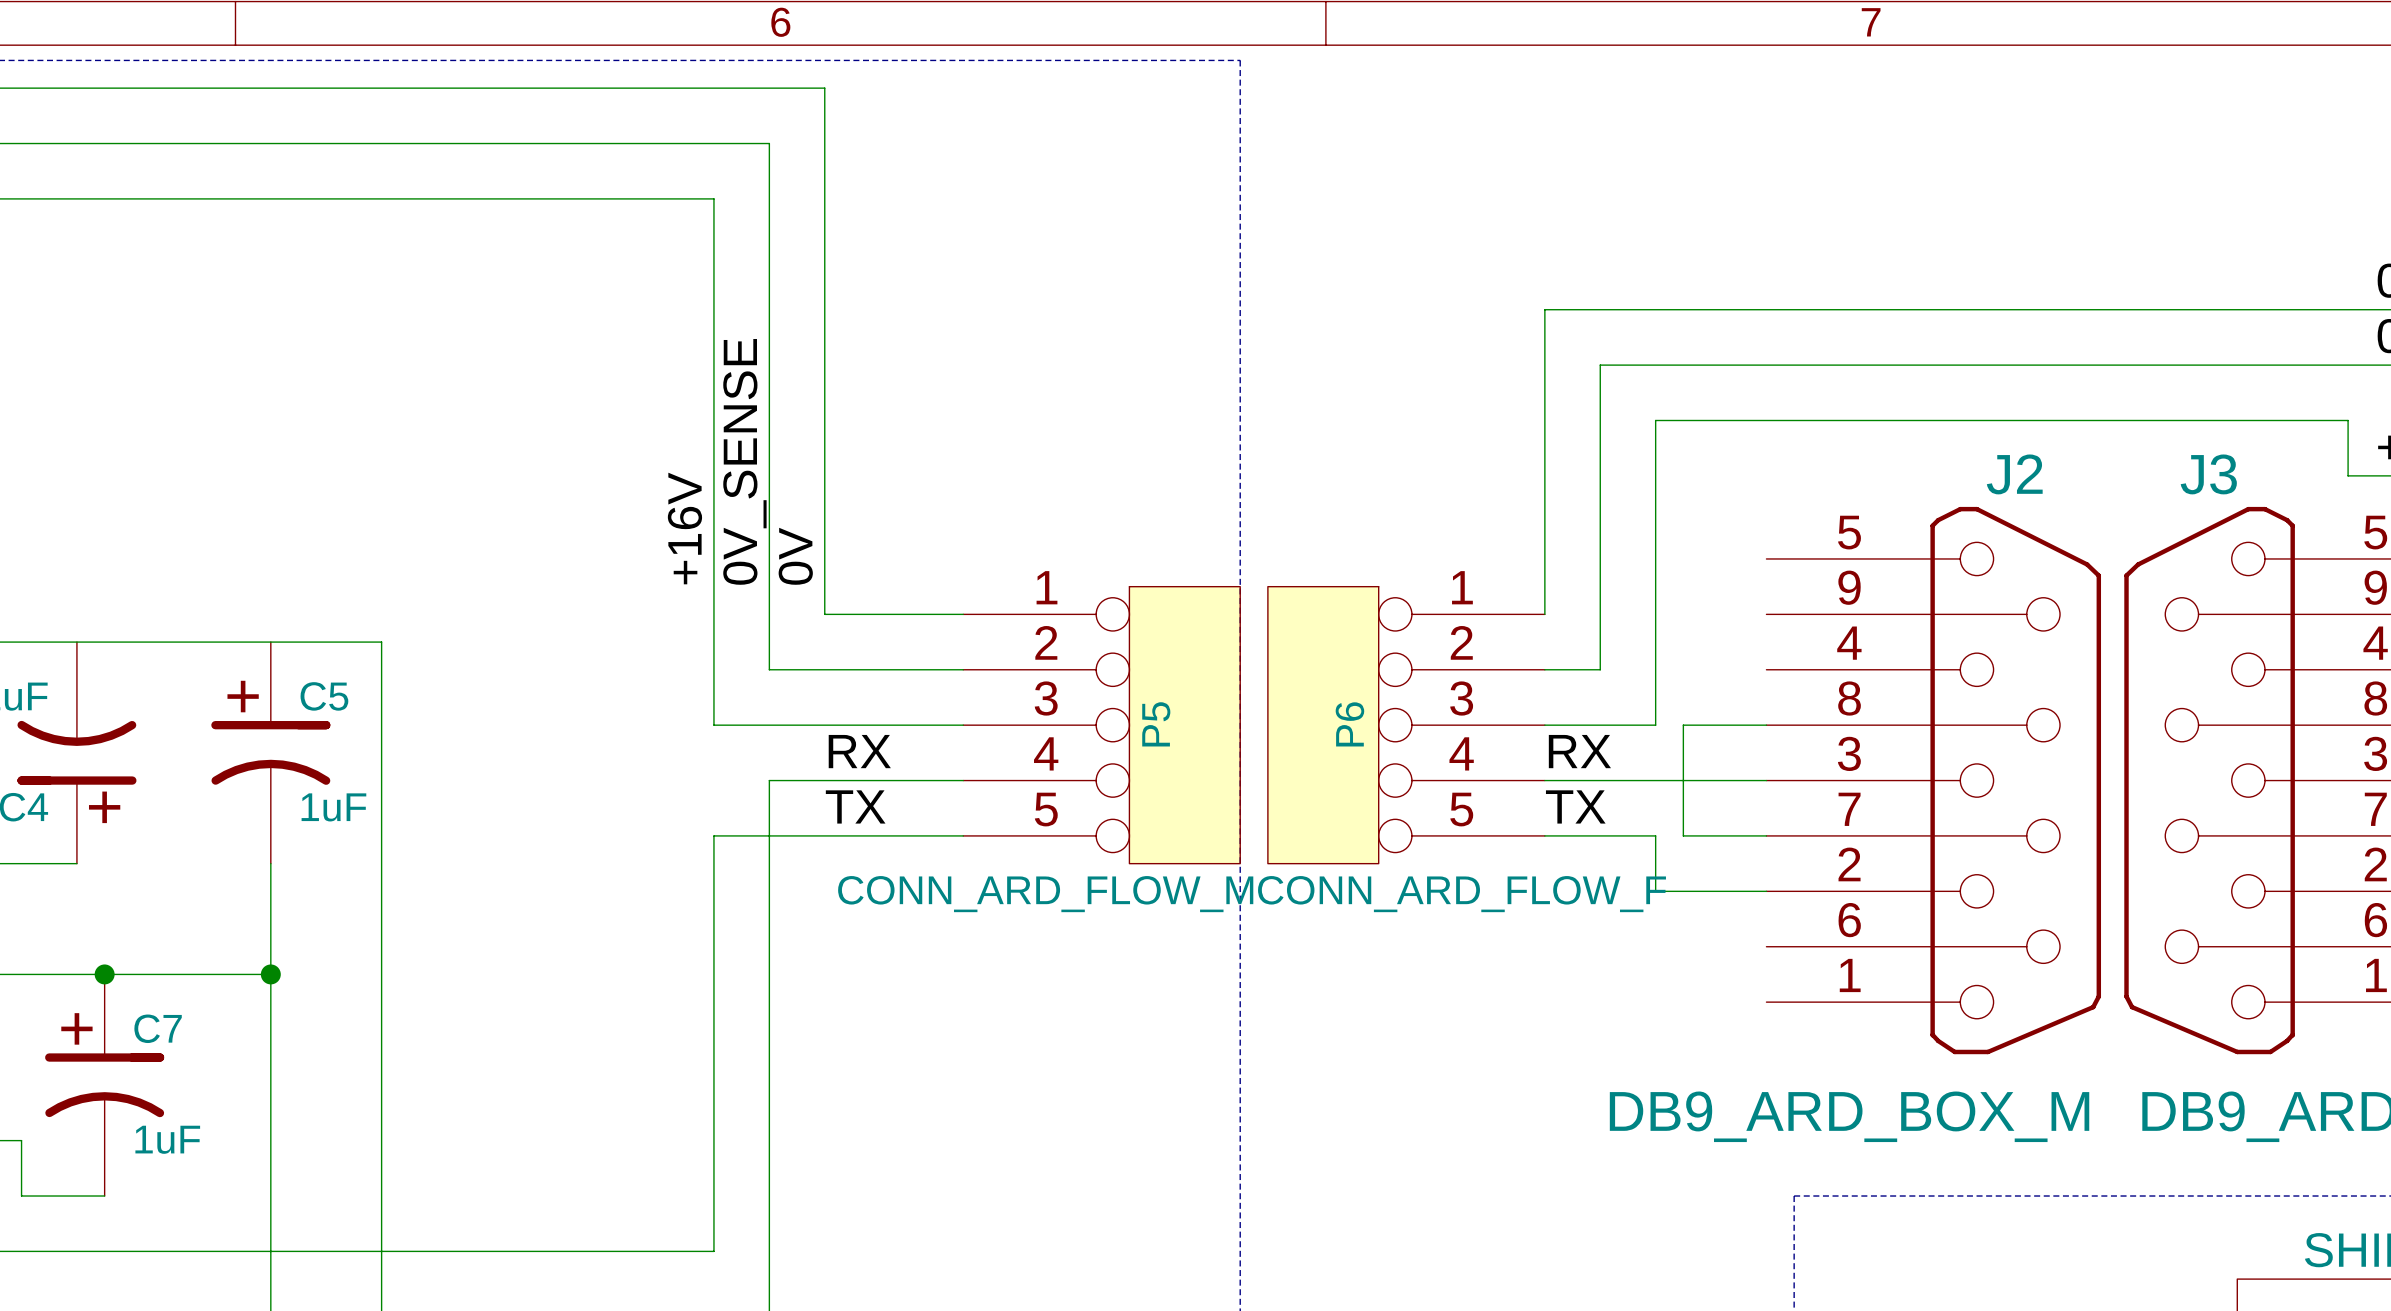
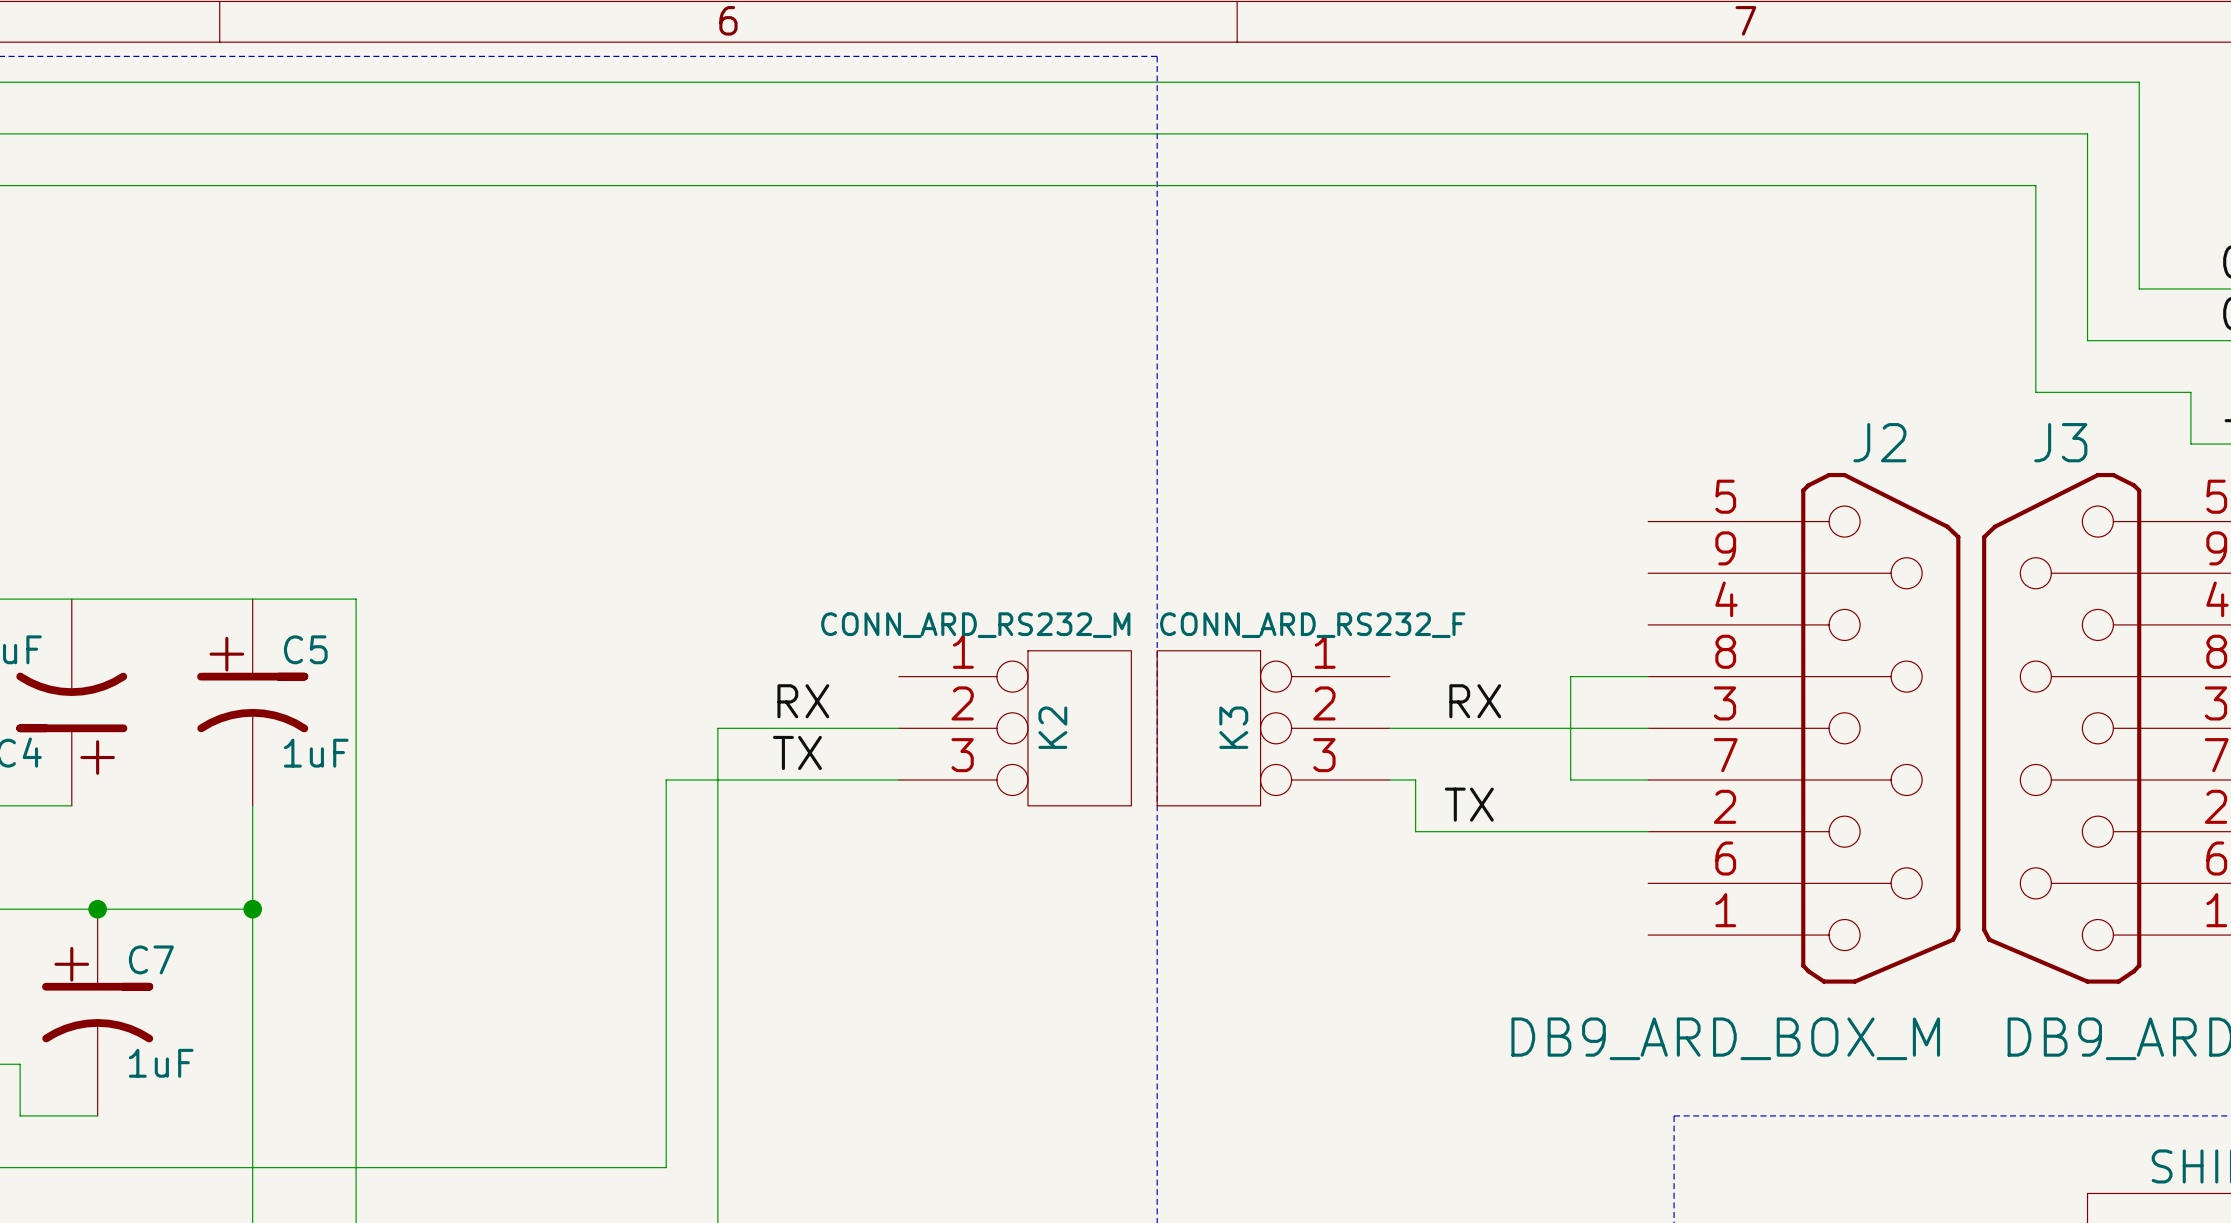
wire: (824, 88) (824, 614) (963, 614) -> none
wire: (769, 143) (769, 669) (963, 669) -> none
wire: (713, 198) (713, 725) (963, 725) -> none
wire: (2292, 309) (1544, 309) (1544, 614) -> (2139, 288) (2139, 82) (769, 82)
wire: (2237, 365) (1600, 365) (1600, 669) (1544, 669) -> (2087, 340) (2087, 133) (717, 133)
wire: (2181, 420) (1655, 420) (1655, 725) (1544, 725) -> (2035, 392) (2035, 185) (666, 185)
label: 0V_SENSE (744, 461) -> none
label: +16V (684, 528) -> none
label: 0V (795, 556) -> none
P5: CONN_ARD_FLOW_M (1101, 725) -> none
P6: CONN_ARD_FLOW_F (1406, 725) -> none
K2: none -> CONN_ARD_RS232_M (1015, 728)
K3: none -> CONN_ARD_RS232_F (1273, 728)
label position: TX (1575, 806) -> TX (1469, 804)
wire: (1544, 835) (1655, 835) (1655, 891) -> (1389, 779) (1415, 779) (1415, 831) (1544, 831)

